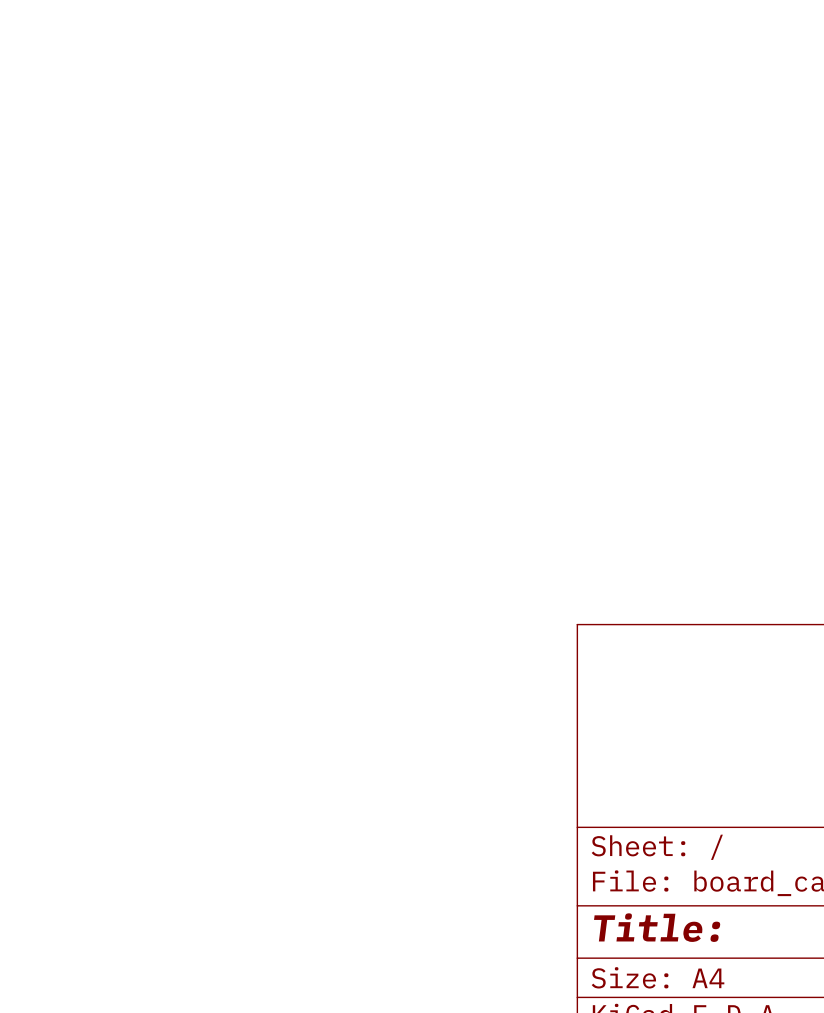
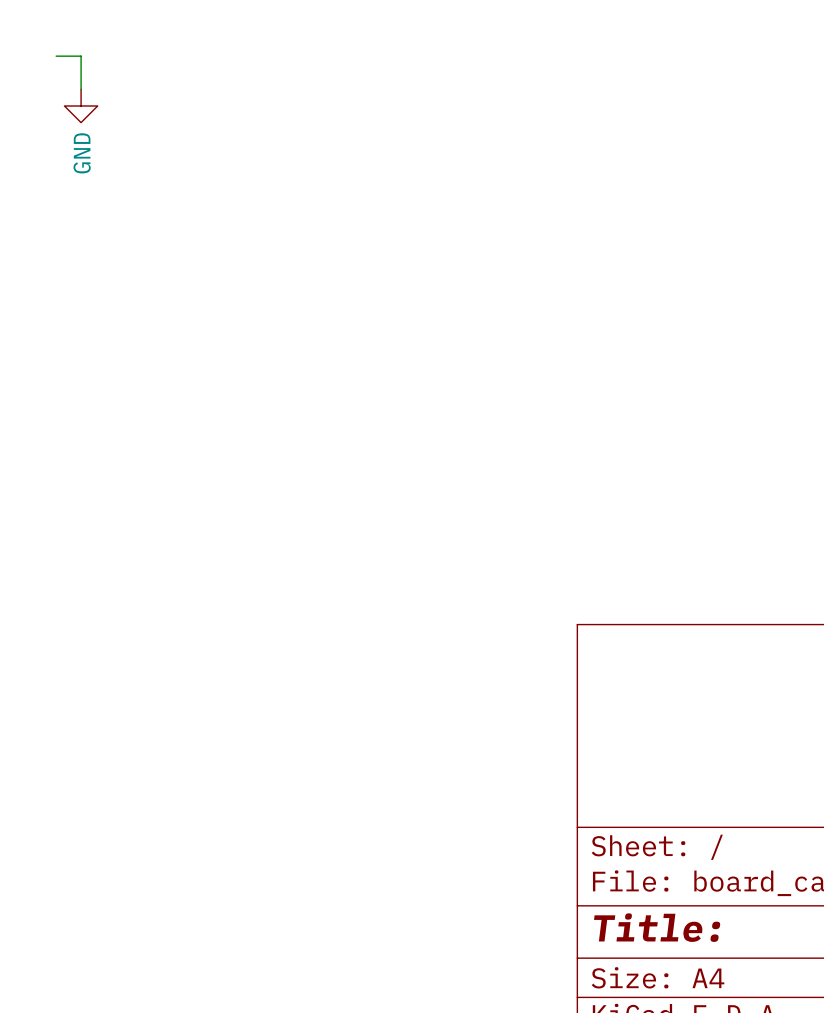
wire: none -> (56, 56) (81, 56) (81, 89)
power symbol: none -> GND (81, 106)

